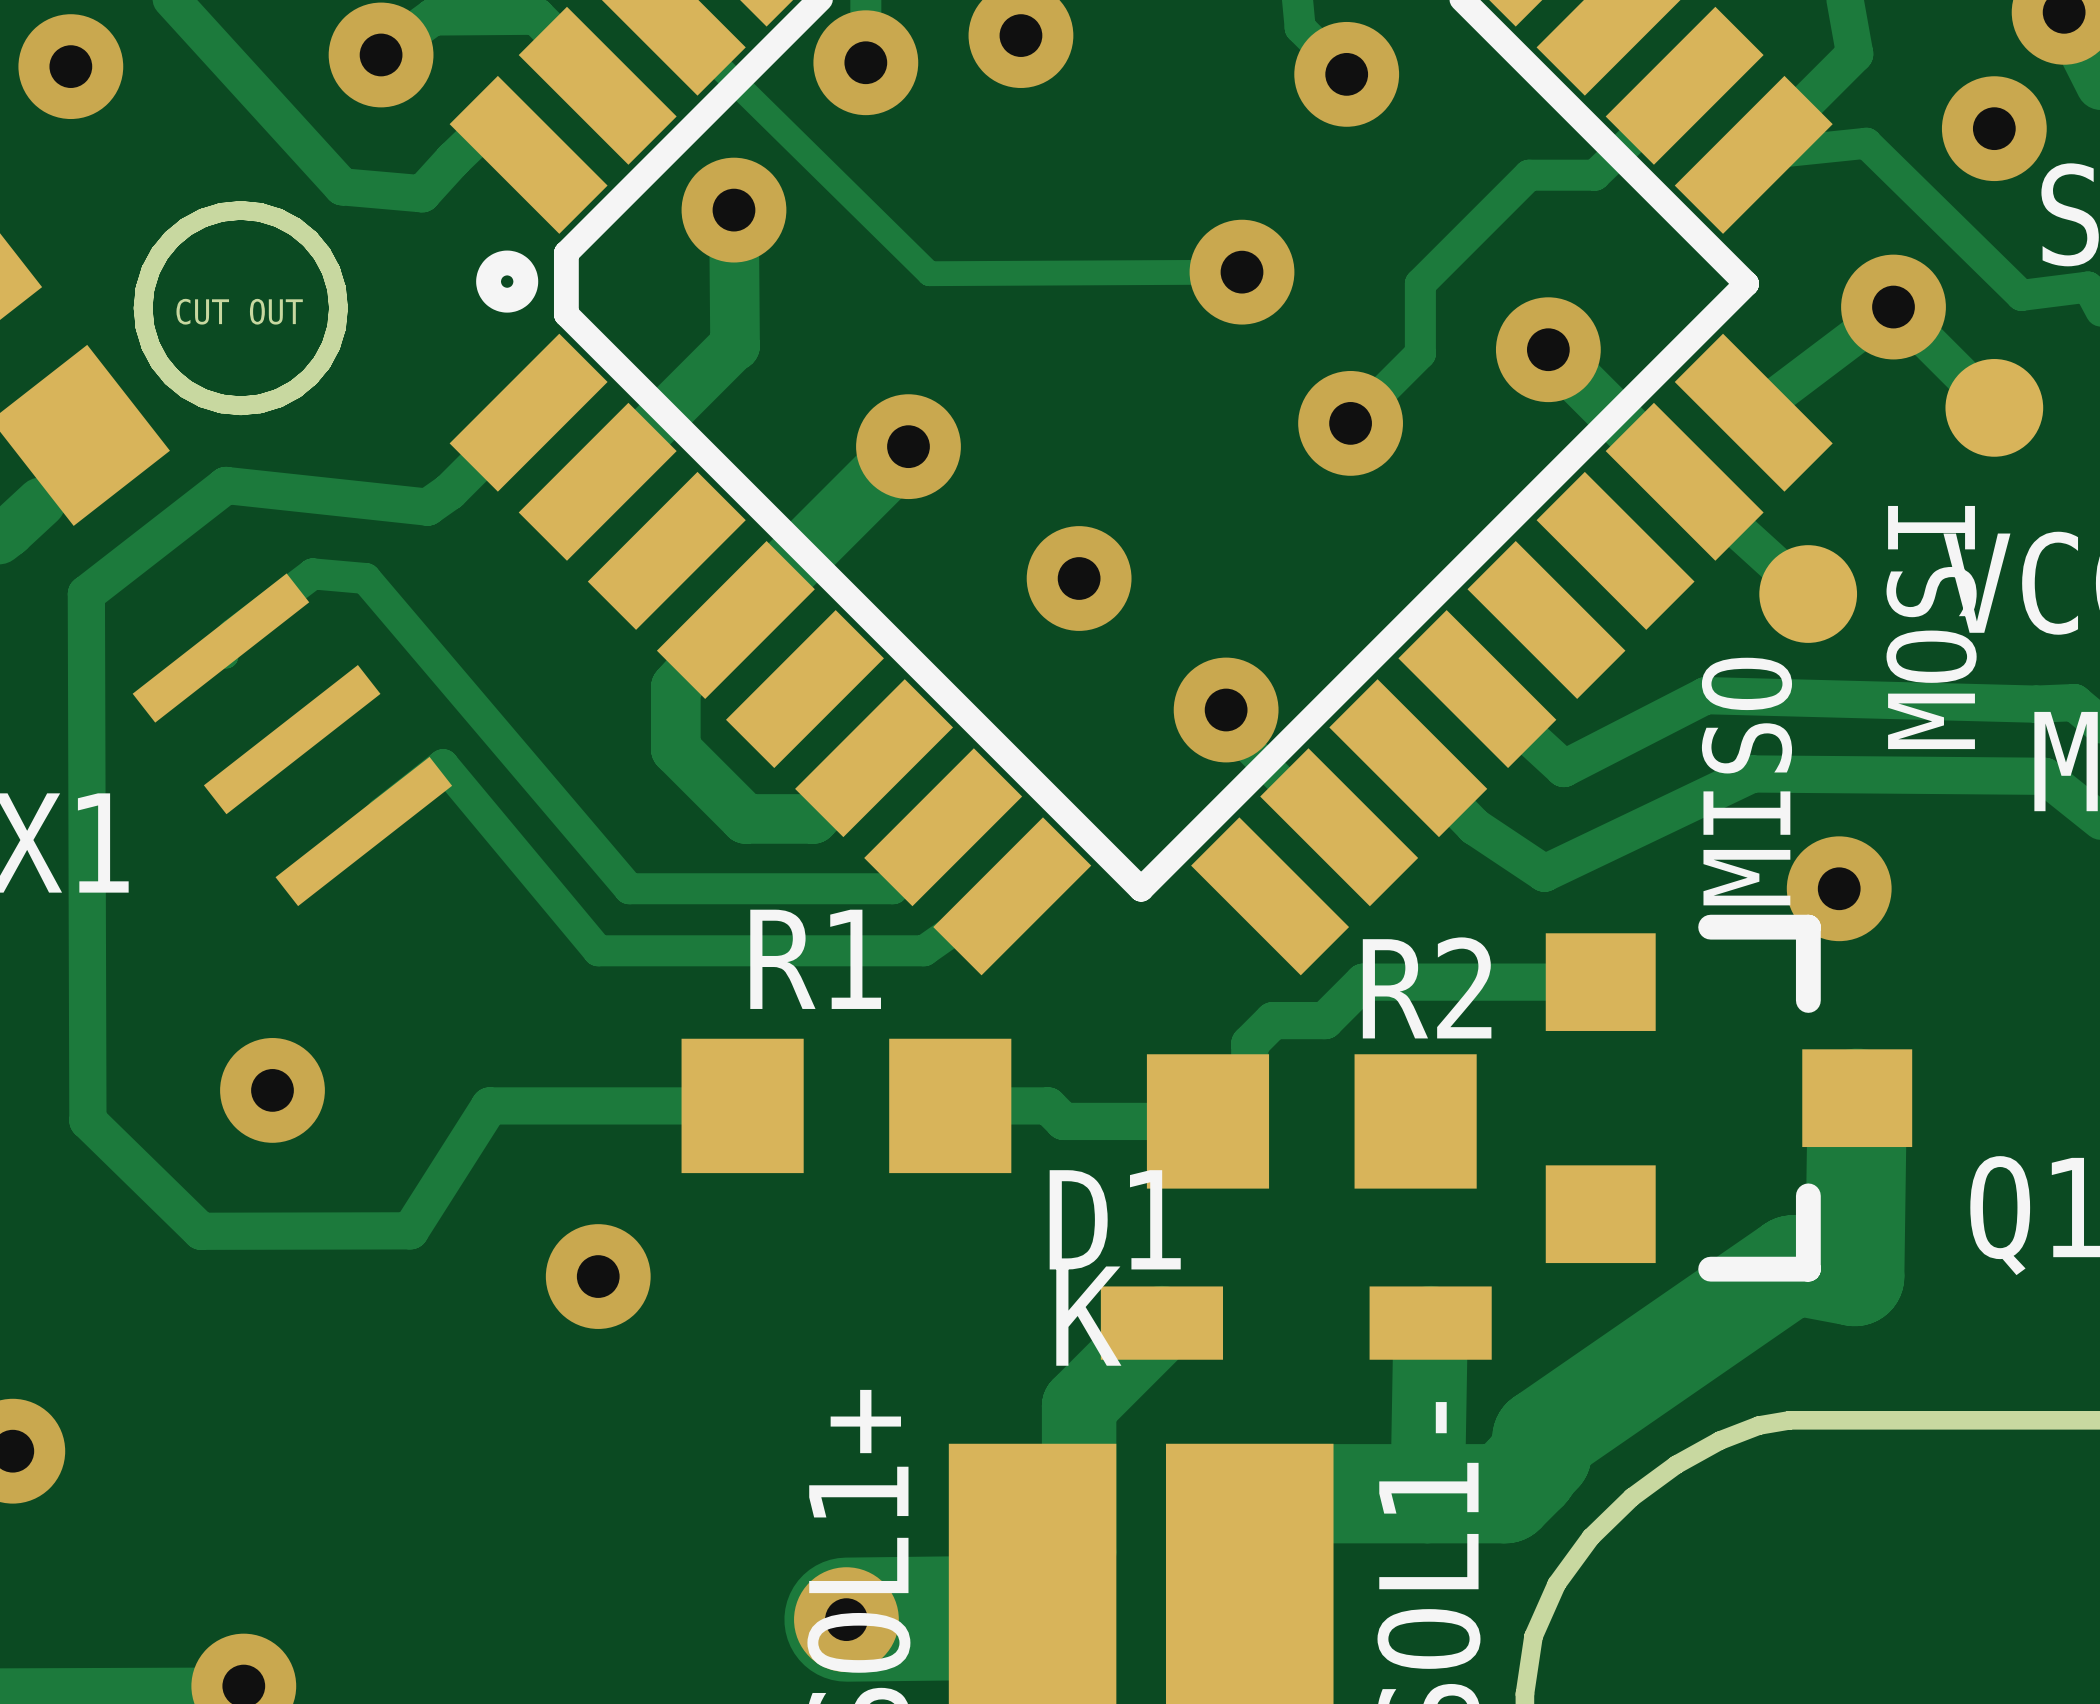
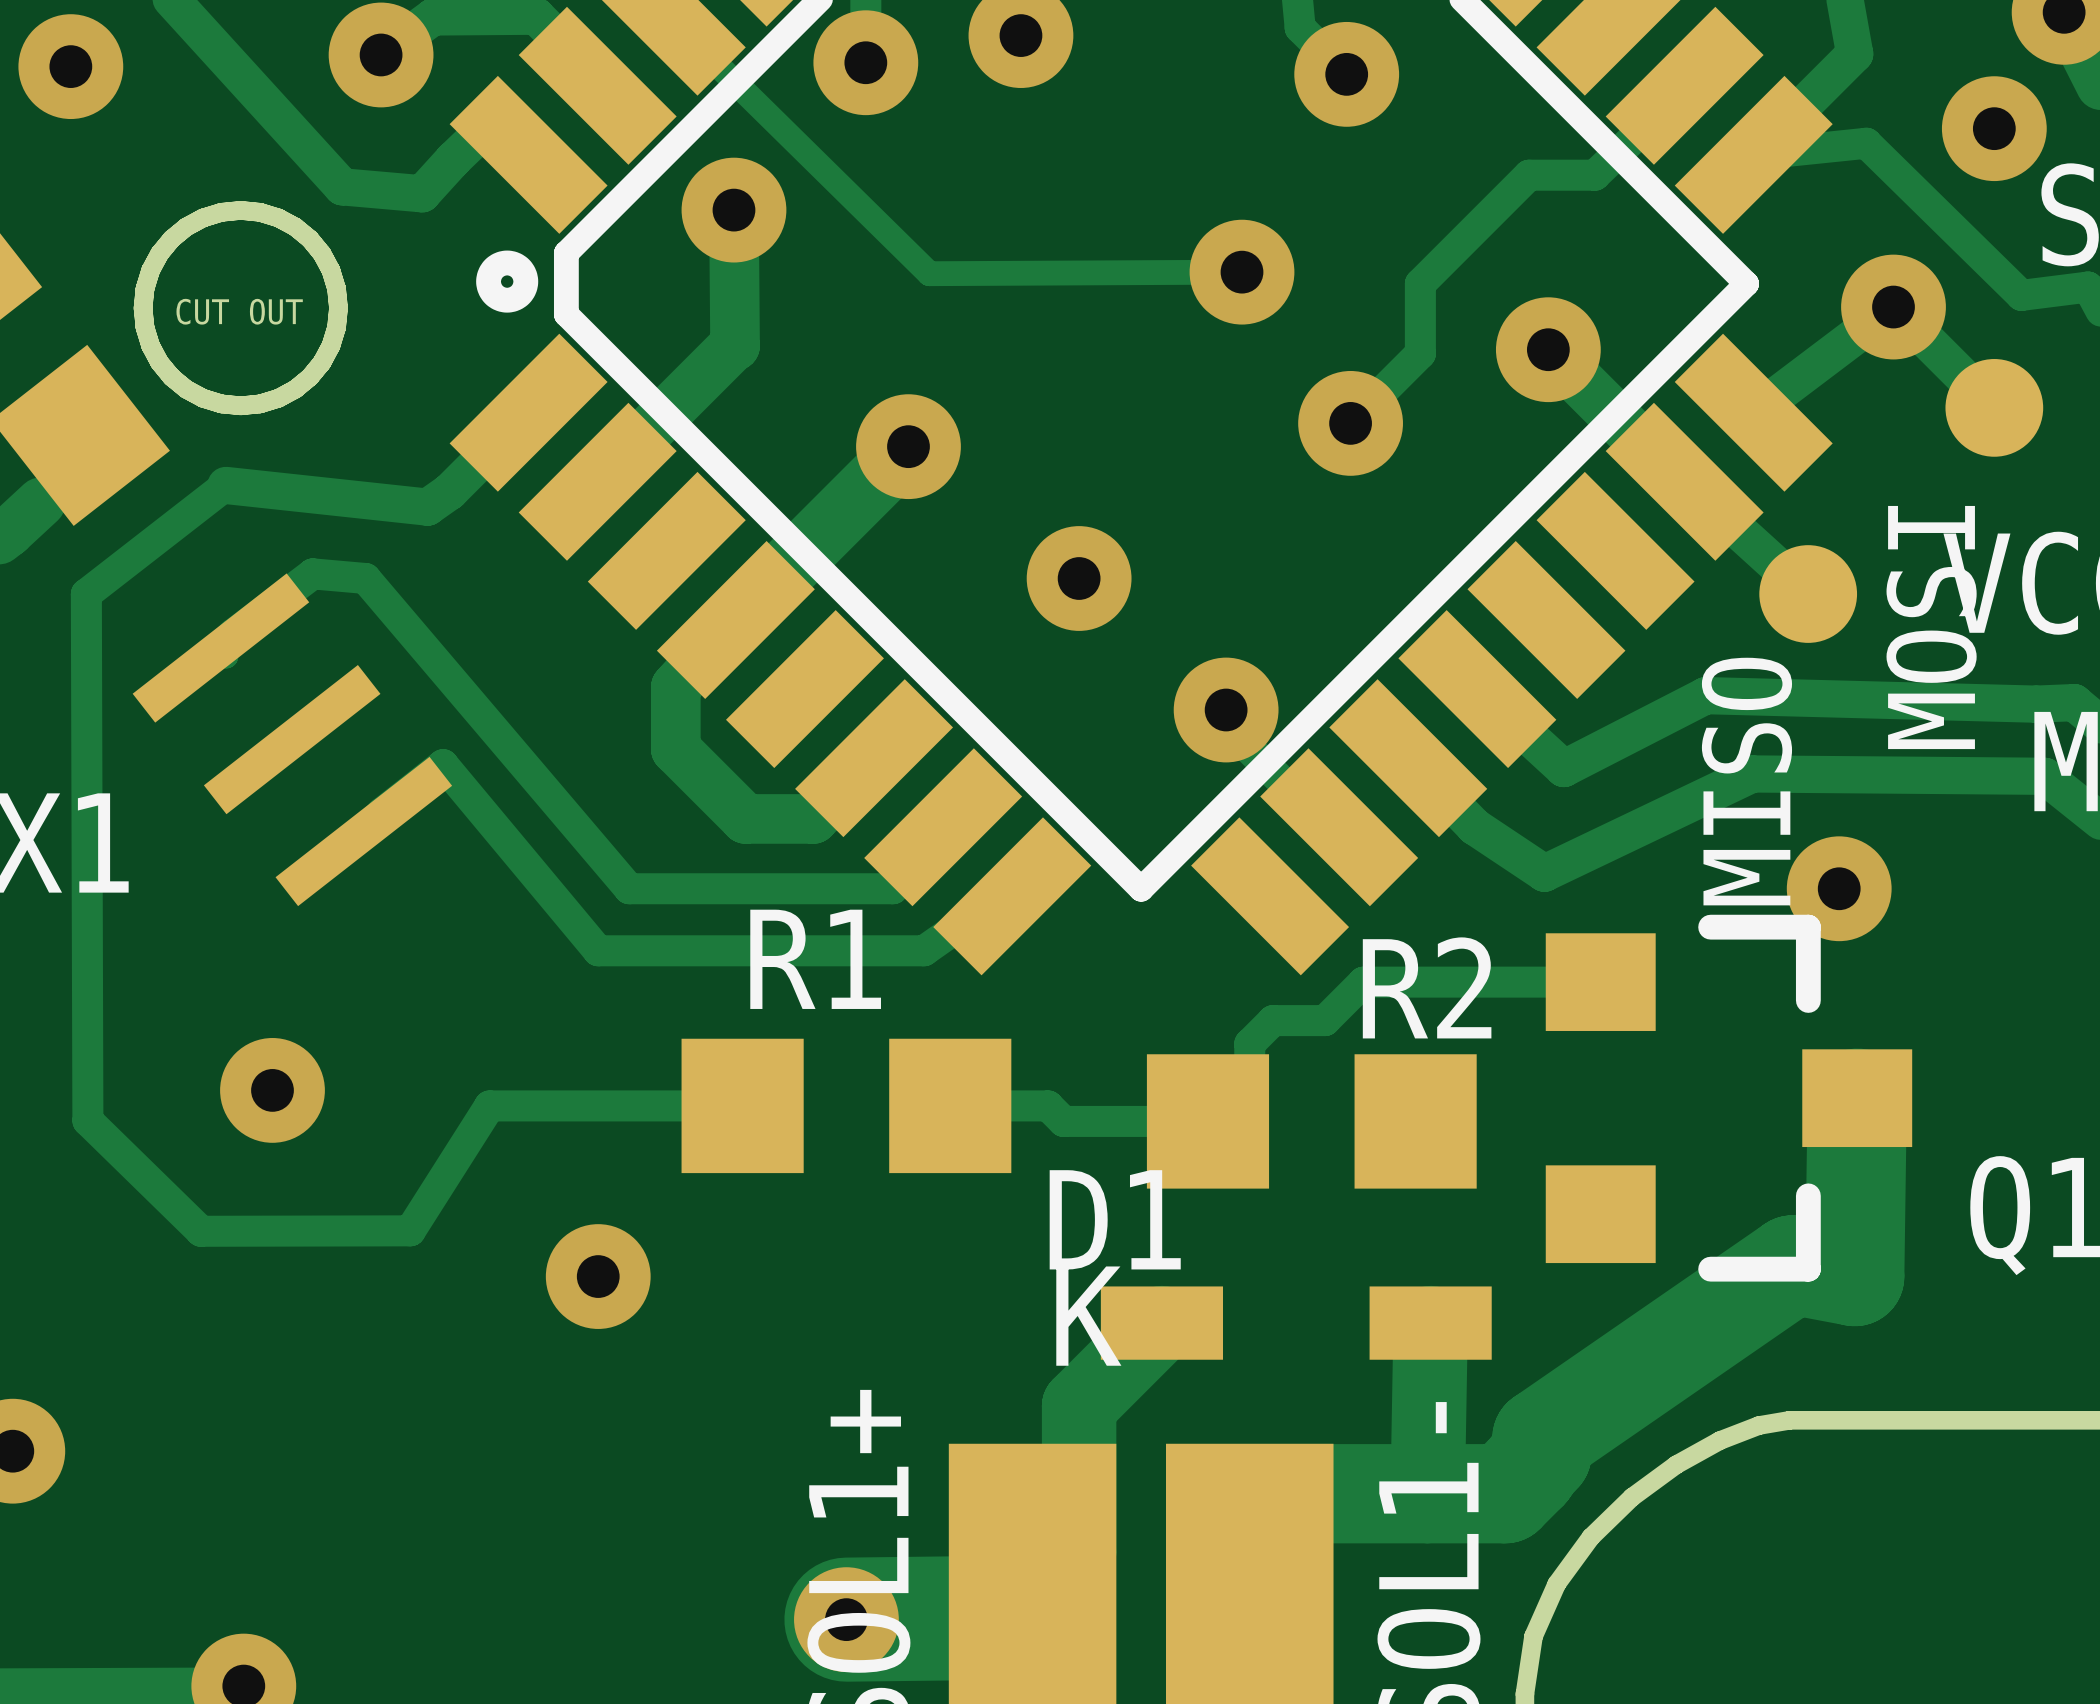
track width: thick (225, 485) (86, 594) (87, 1120) (201, 1231) (410, 1230) (489, 1105) (742, 1105) -> thin (225, 485) (86, 594) (87, 1120) (201, 1231) (410, 1230) (489, 1105) (742, 1105)
track width: thick (1600, 982) (1363, 982) (1324, 1020) (1273, 1020) (1249, 1043) (1249, 1079) (1207, 1121) (1063, 1121) (1048, 1105) (950, 1105) -> thin (1600, 982) (1363, 982) (1324, 1020) (1273, 1020) (1249, 1043) (1249, 1079) (1207, 1121) (1063, 1121) (1048, 1105) (950, 1105)

